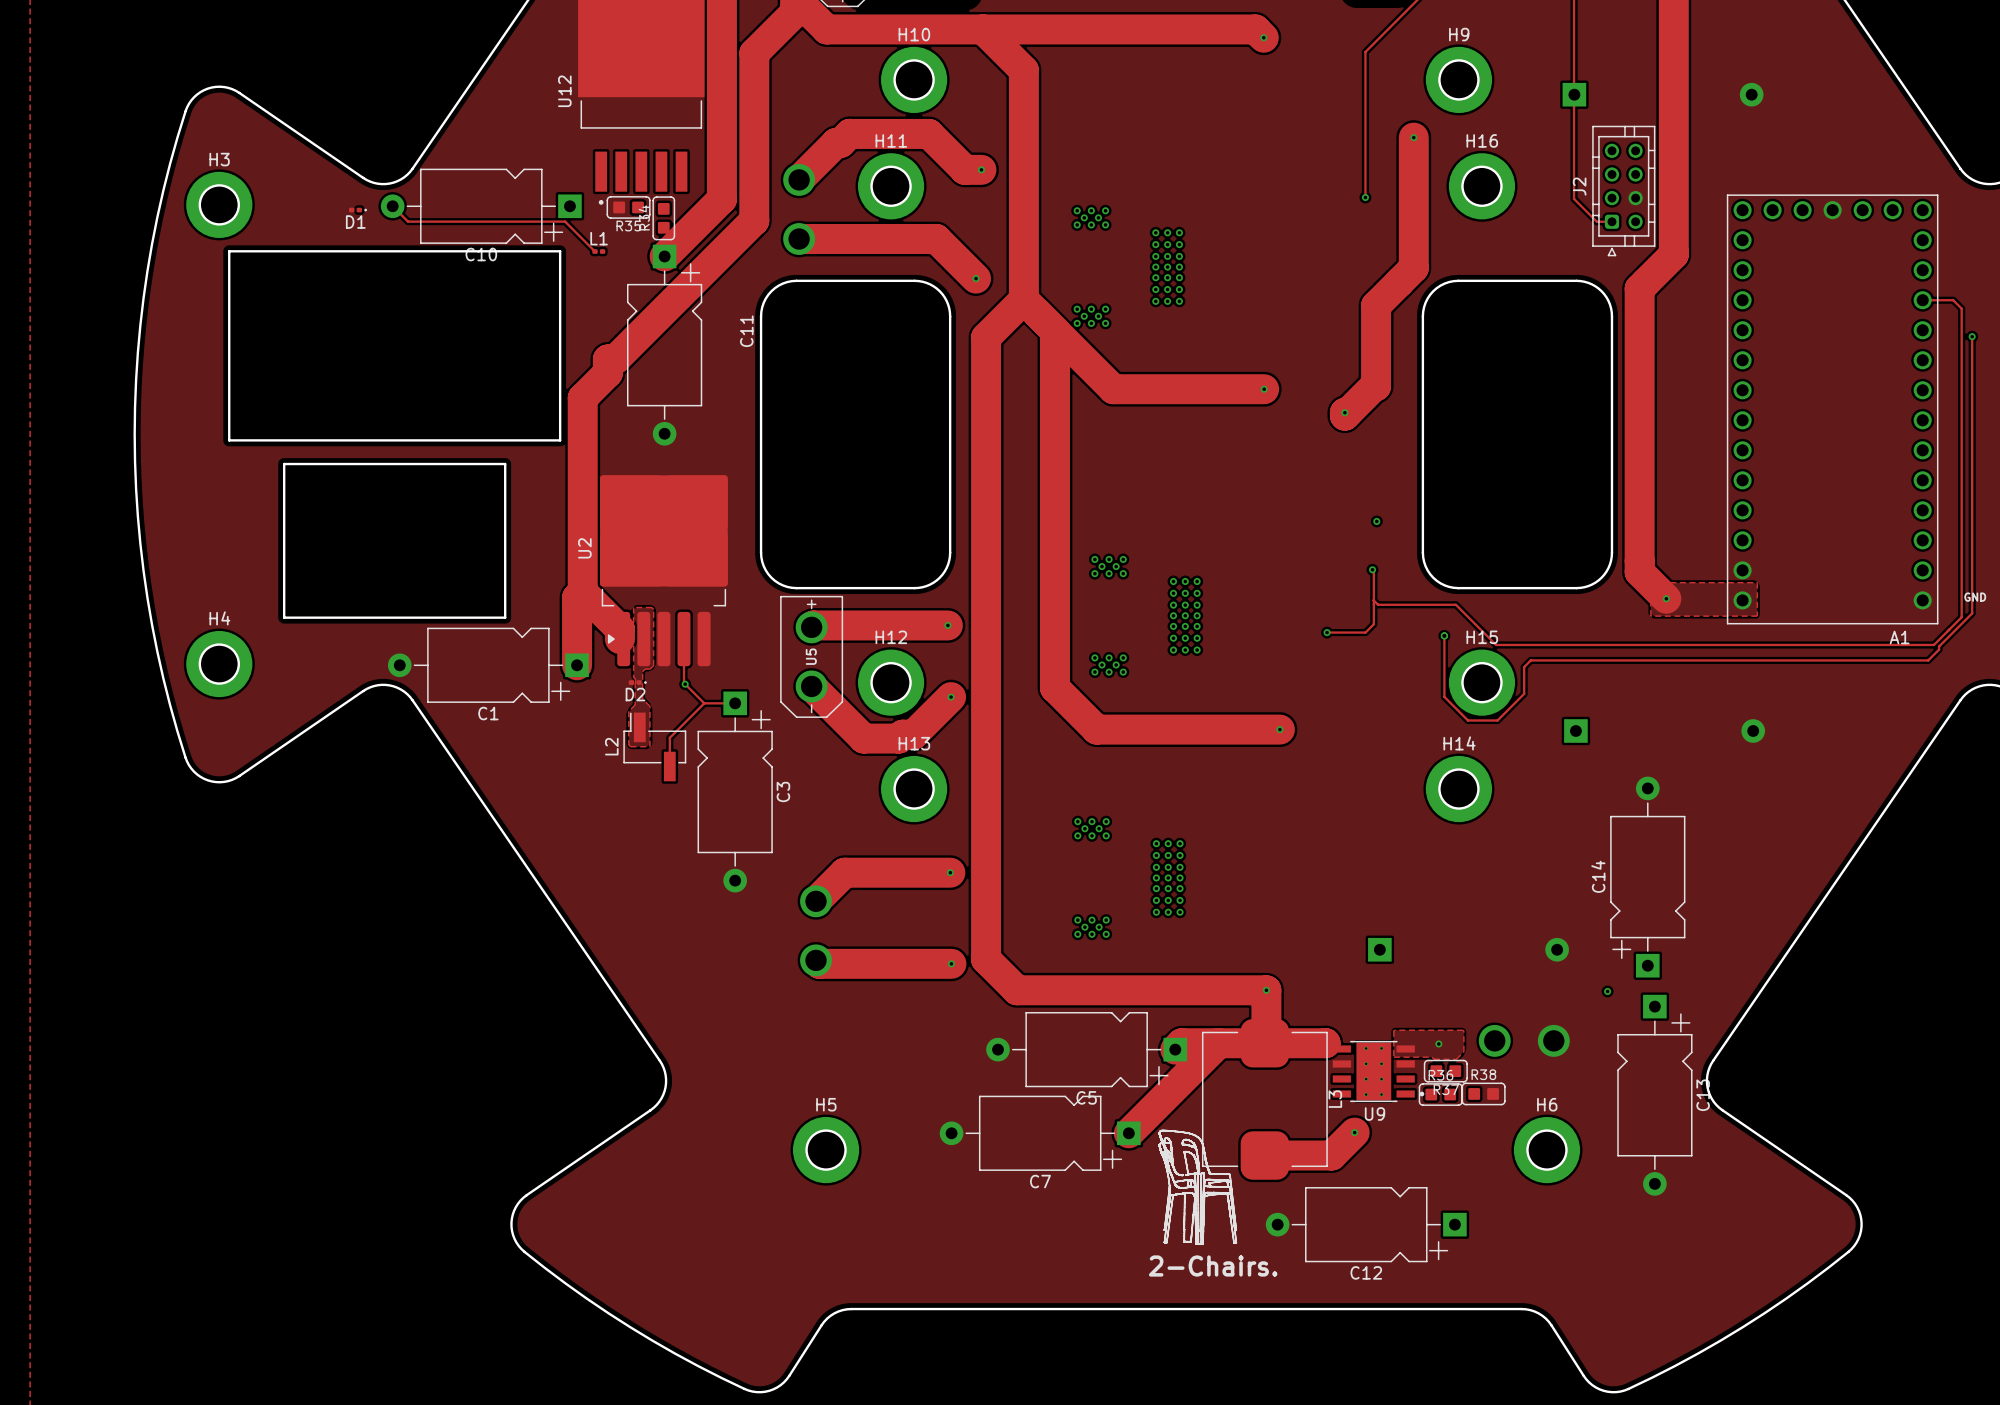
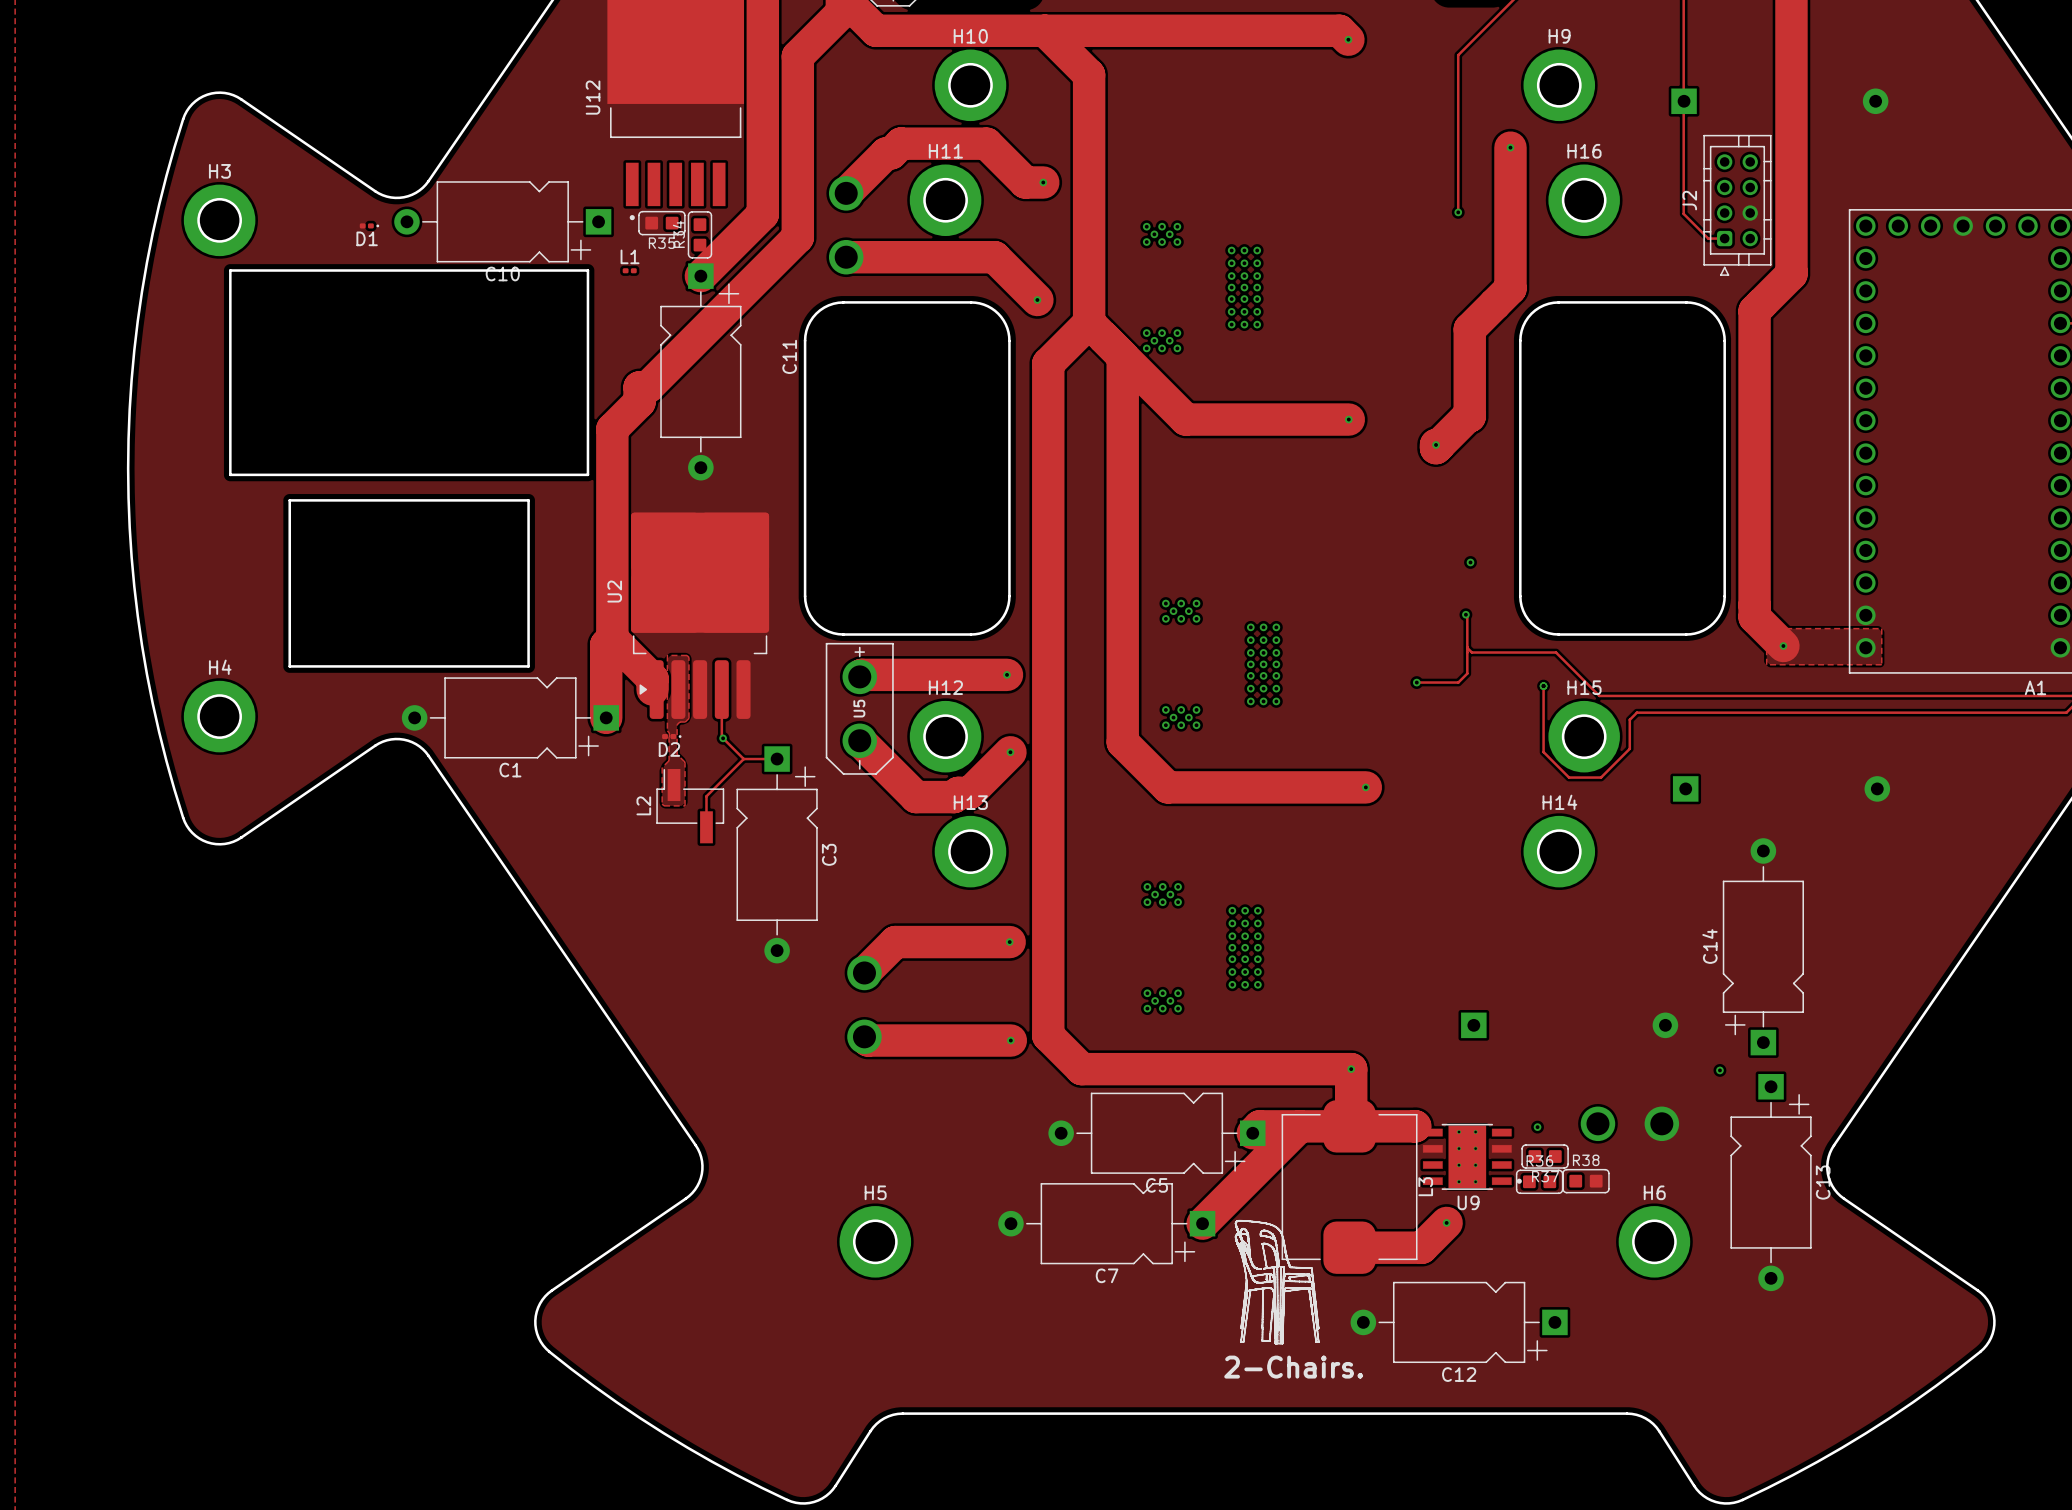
track: (392, 206) (408, 221) (565, 221) (595, 251) -> none
zone outline: (1393, 1057) (1394, 1030) (1463, 1031) (1463, 1051) (1456, 1059) (1433, 1059) -> none
zone outline: (1393, 1057) (1432, 1057) (1433, 1059) -> none

